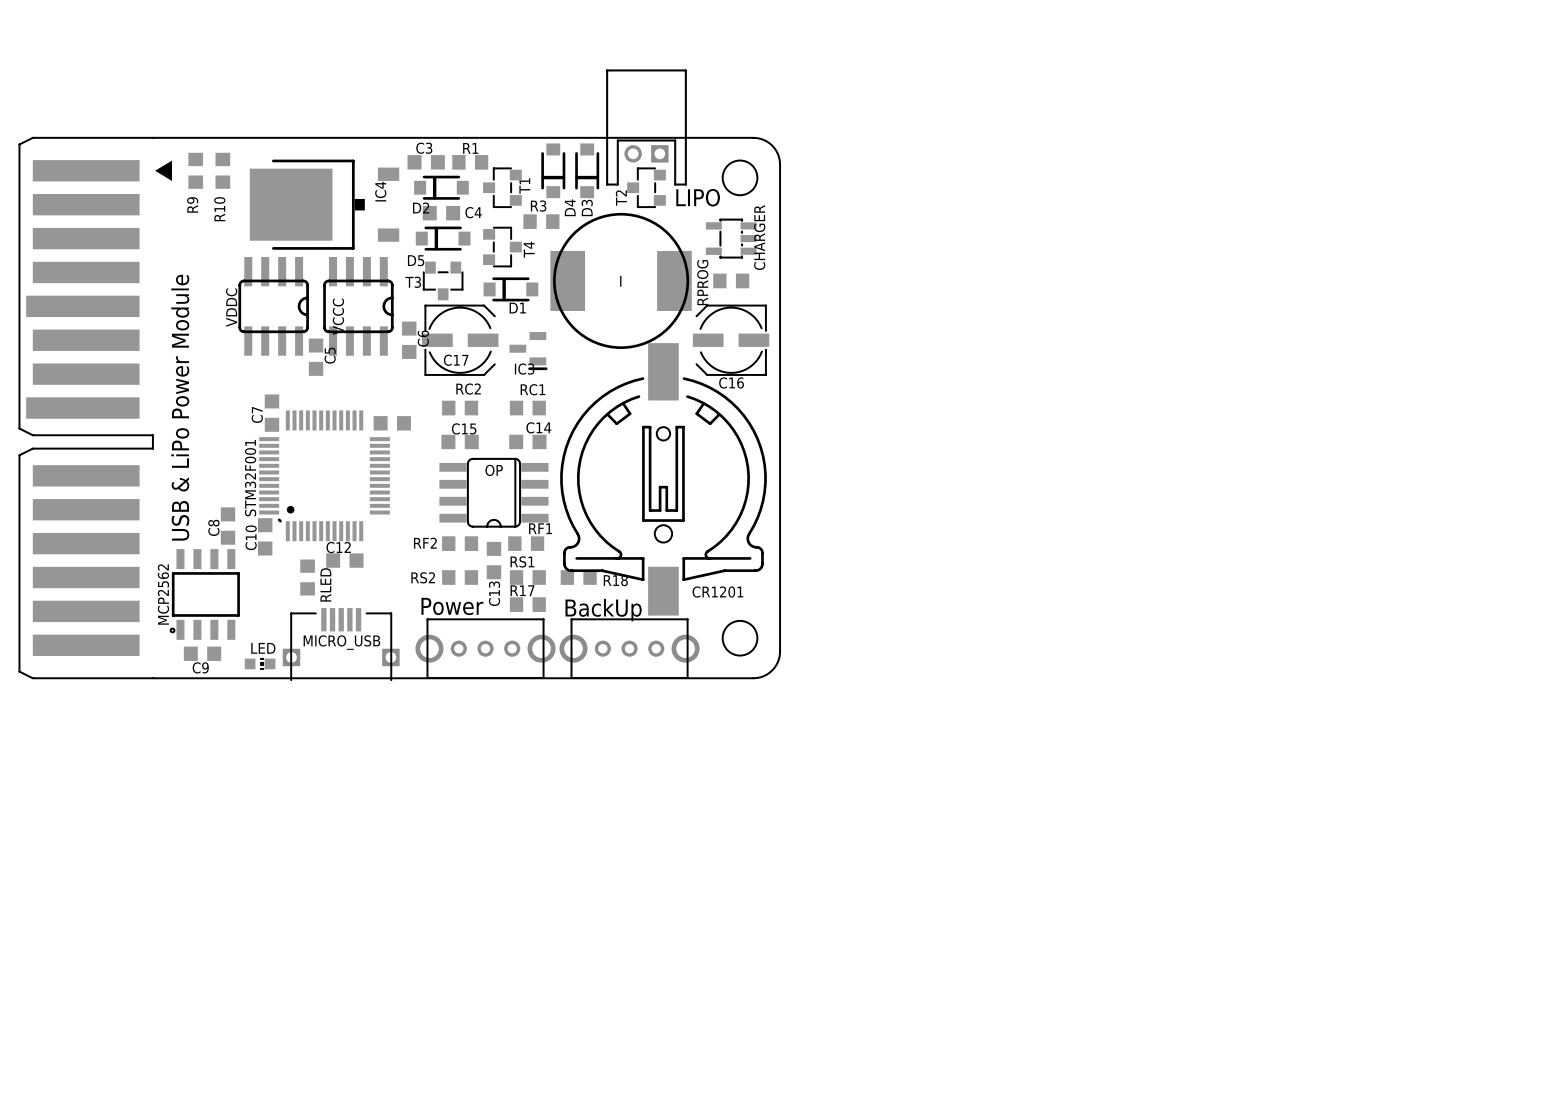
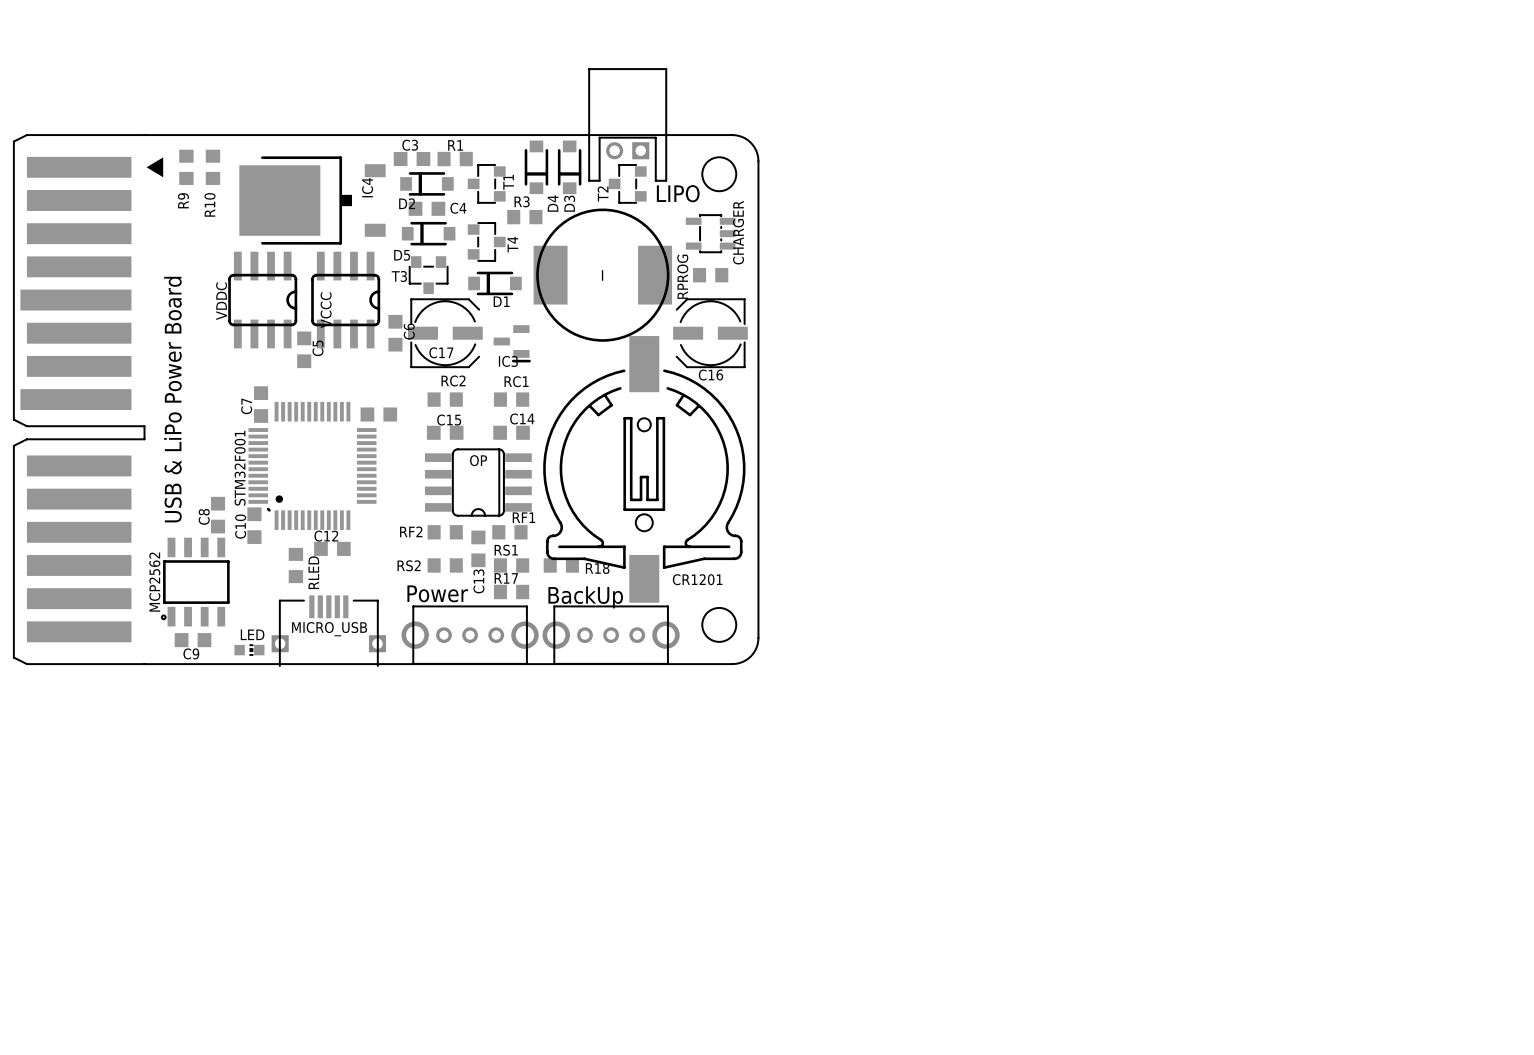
text: USB & LiPo Power Module (180, 407) -> USB & LiPo Power Board (172, 399)

